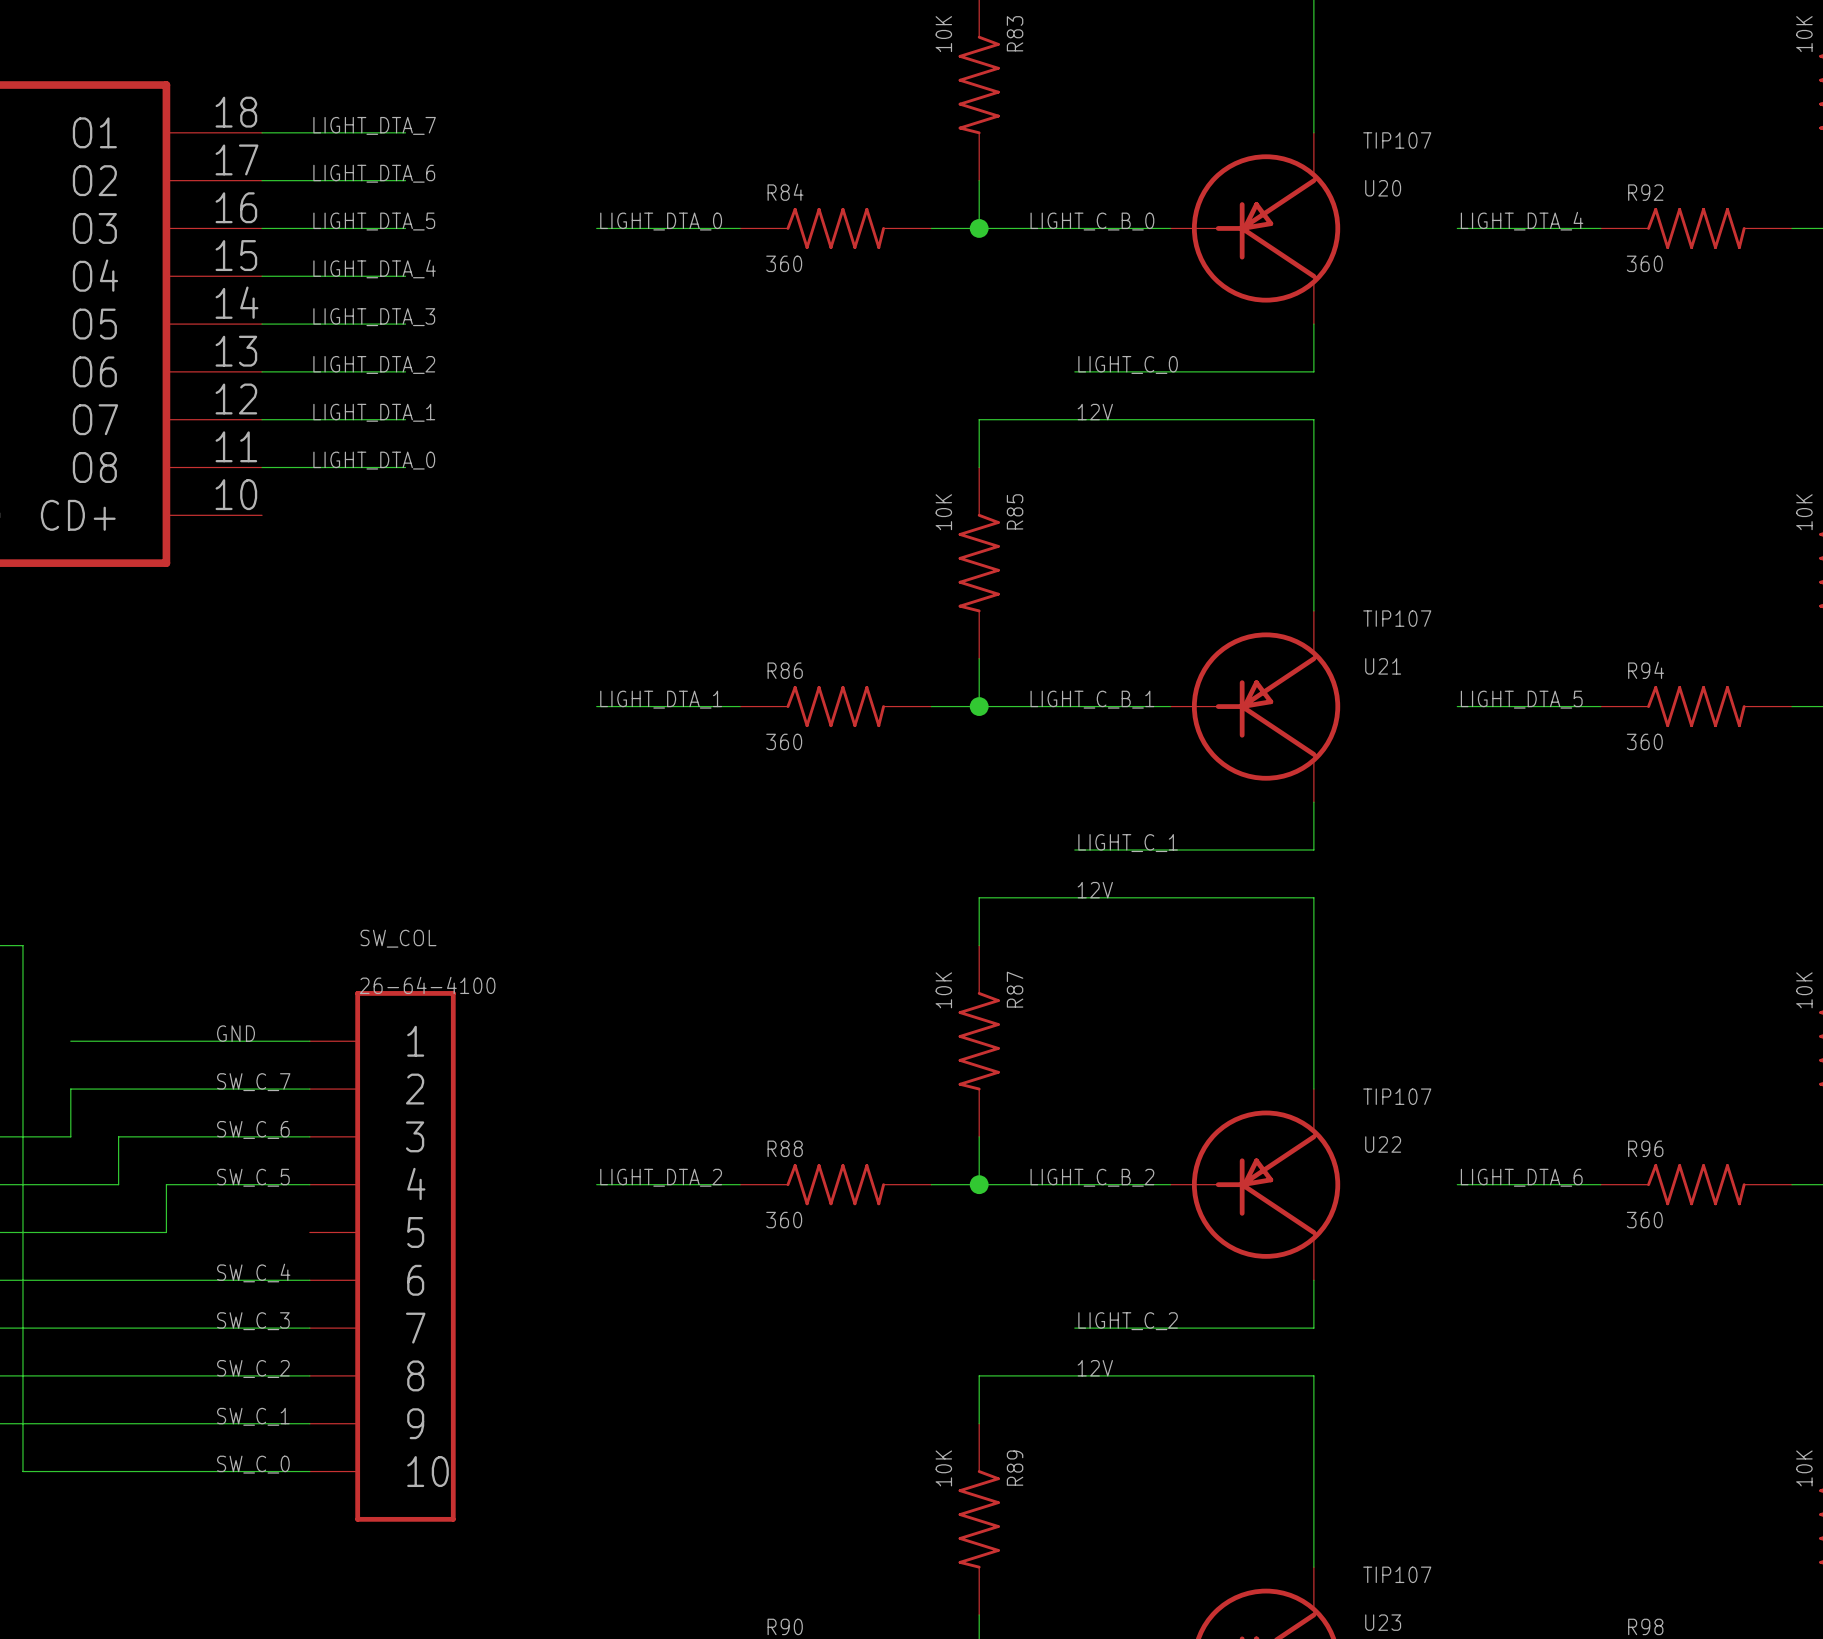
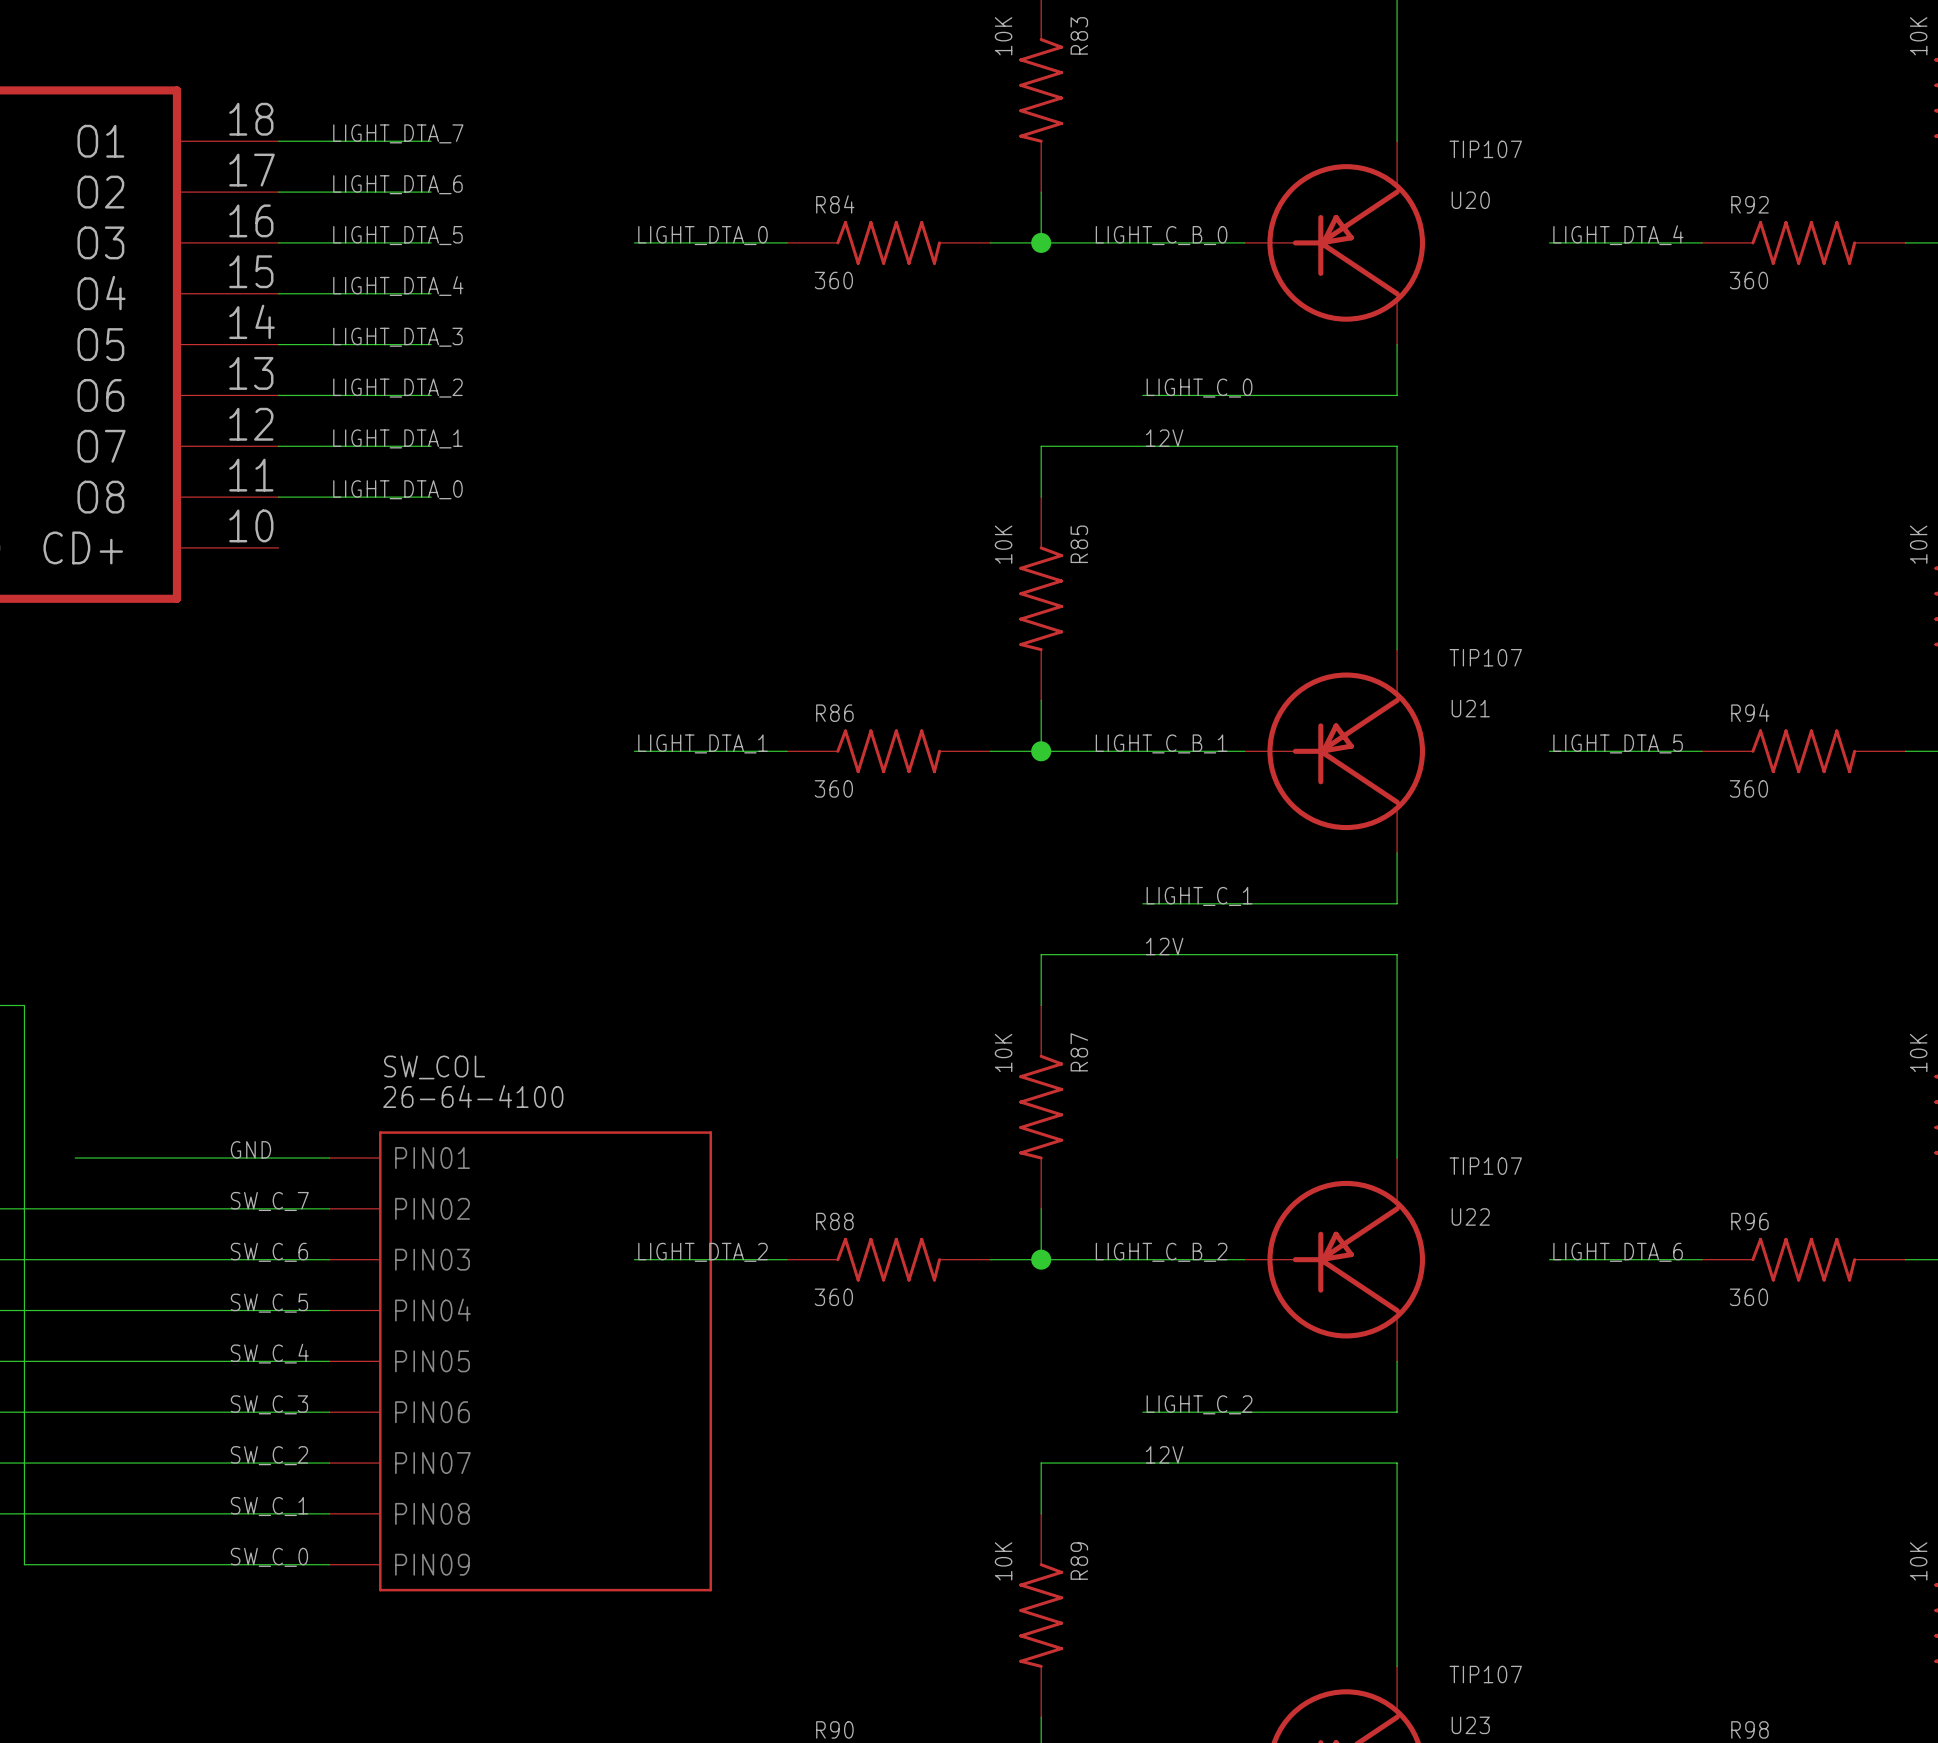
label: GND (236, 1033) -> none
wire: (70, 1041) (309, 1041) -> none
label: SW_C_7 (253, 1082) -> GND (250, 1149)
wire: (70, 1089) (70, 1136) -> (126, 1208) (75, 1208)
label: SW_C_6 (253, 1129) -> SW_C_7 (269, 1201)
wire: (118, 1136) (118, 1184) -> (176, 1259) (126, 1259)
label: SW_C_5 (253, 1177) -> SW_C_6 (269, 1252)
wire: (166, 1184) (166, 1232) -> (329, 1310) (176, 1310)
label: none -> SW_C_5 (269, 1303)
SW_COL: 26-64-4100 (382, 1256) -> none
SW_COL: none -> 26-64-4100 (520, 1361)

